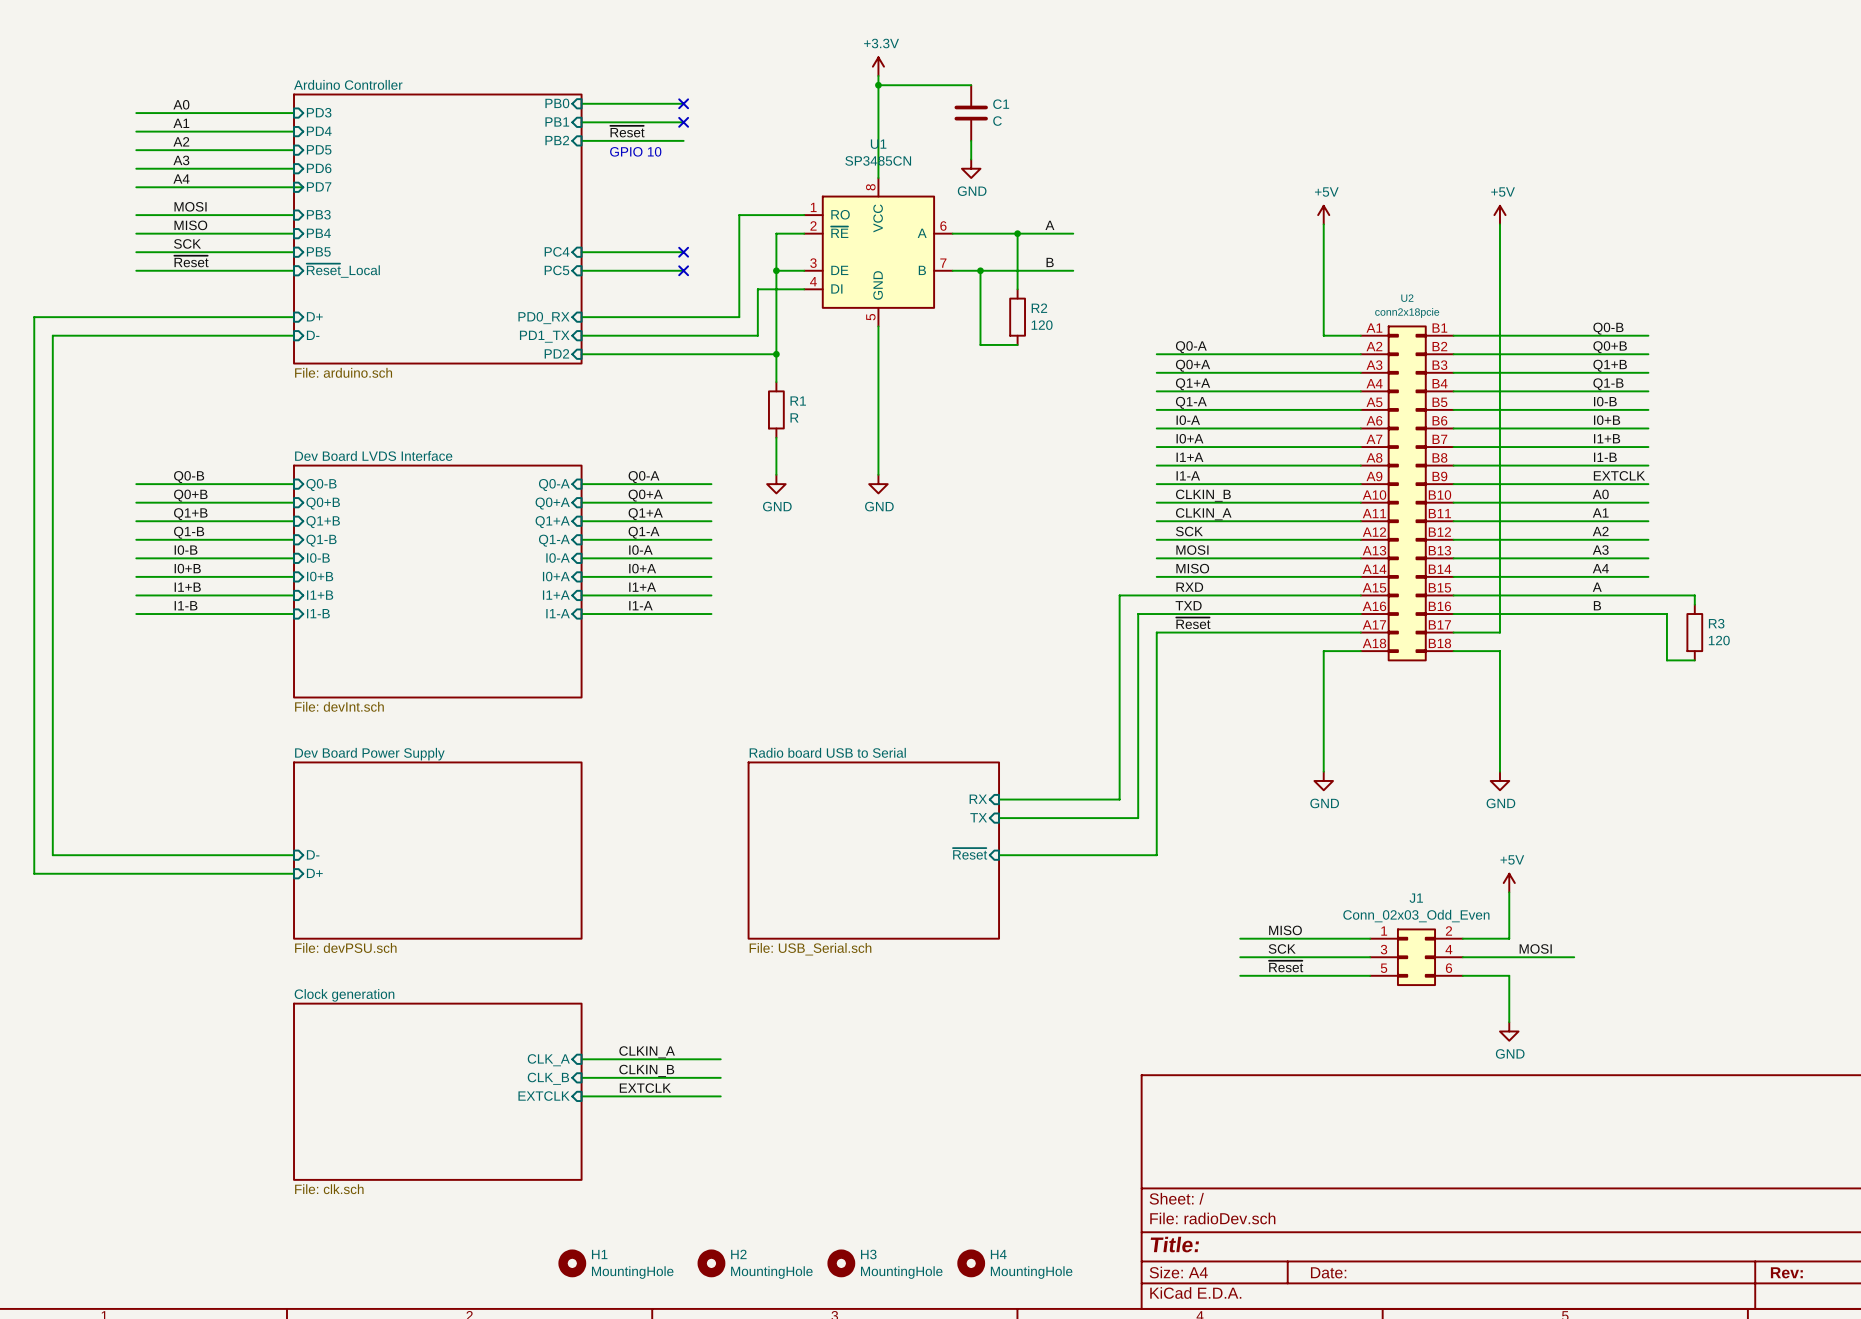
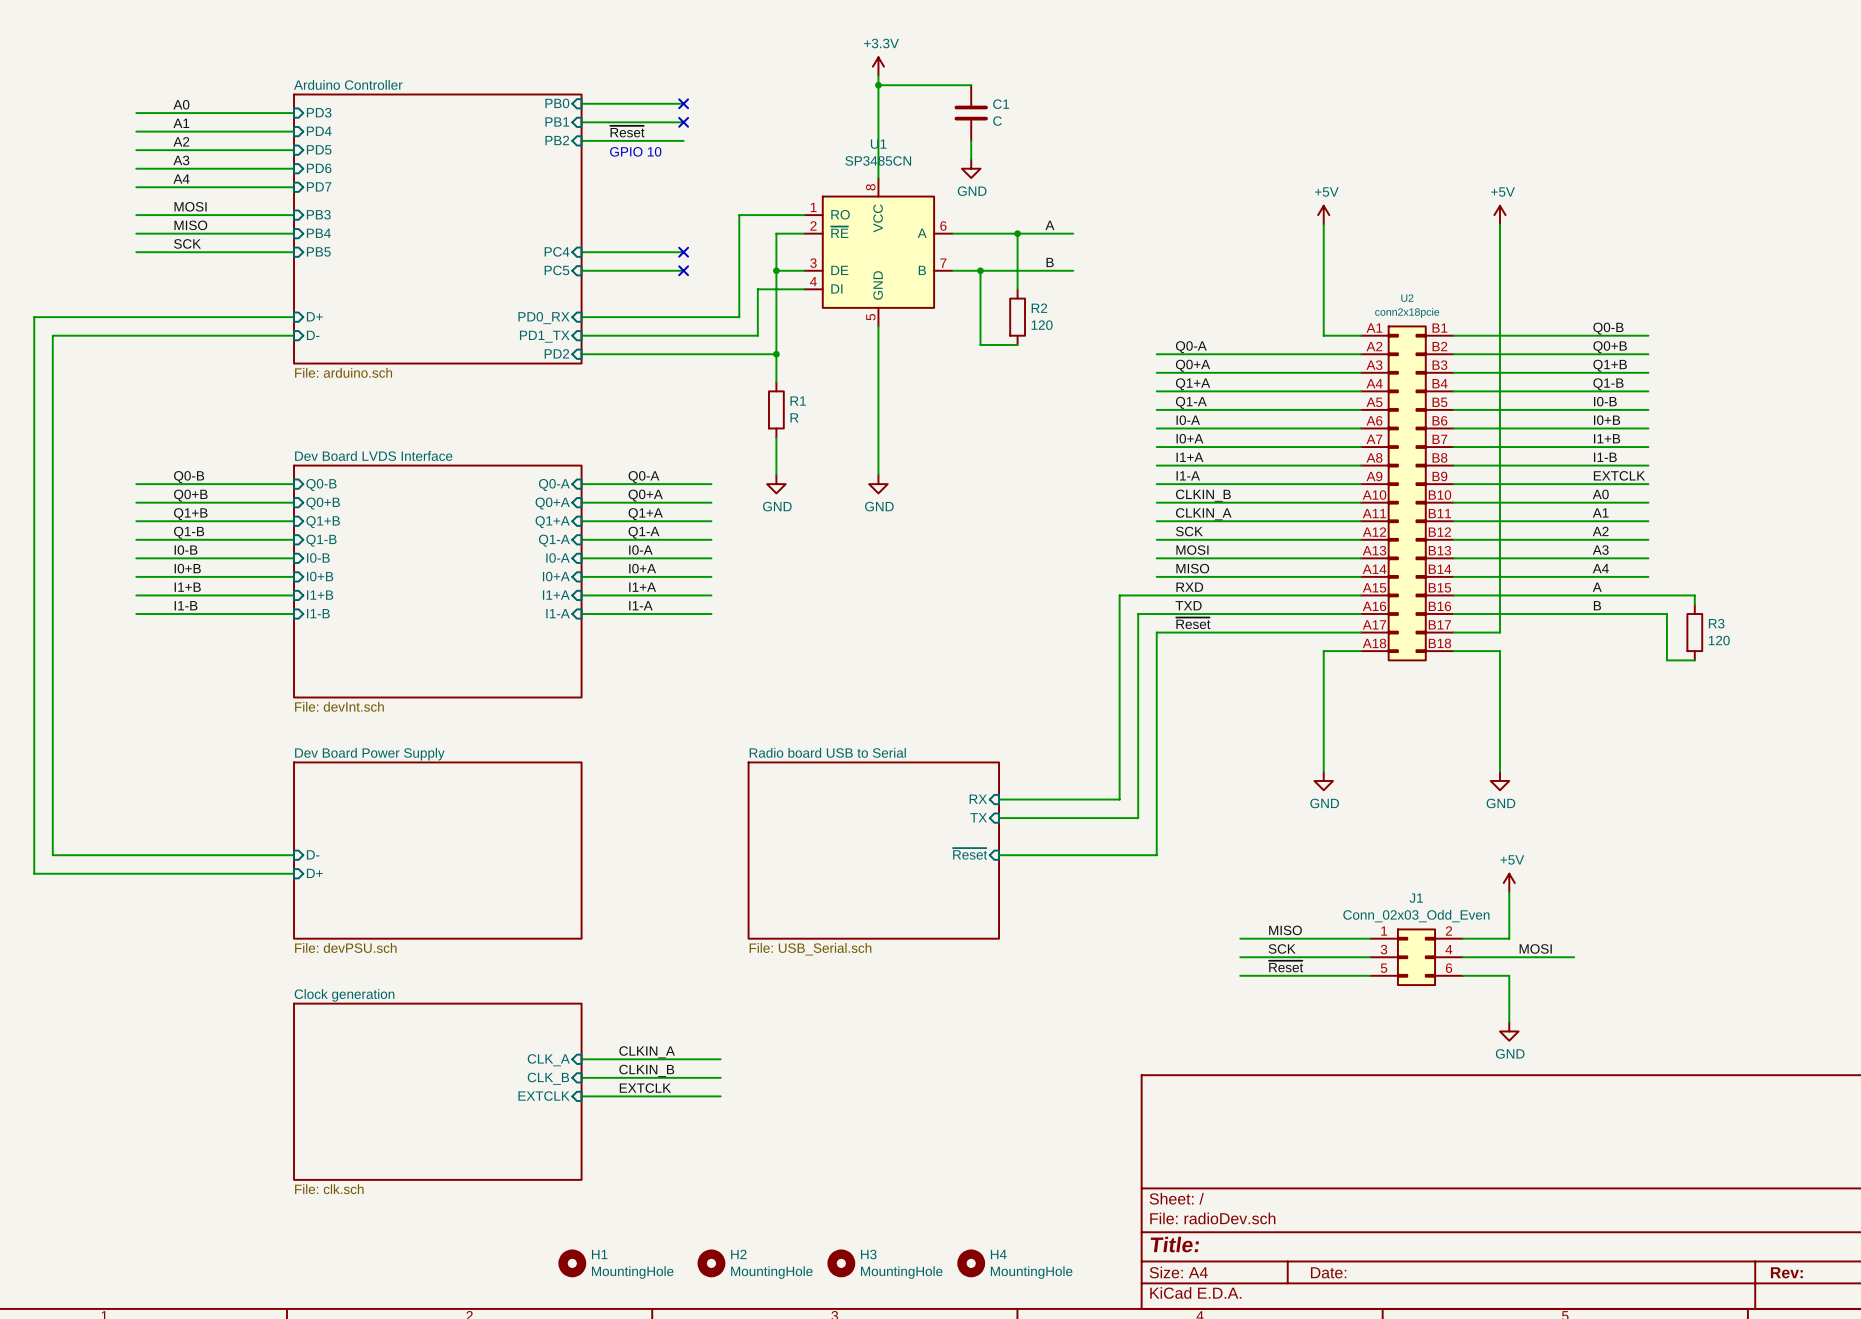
wire: (294, 187) (303, 187) -> none
label: ~{Reset} (191, 261) -> none
wire: (136, 270) (294, 270) -> none
sheet pin: ~{Reset}_Local (343, 270) -> none

